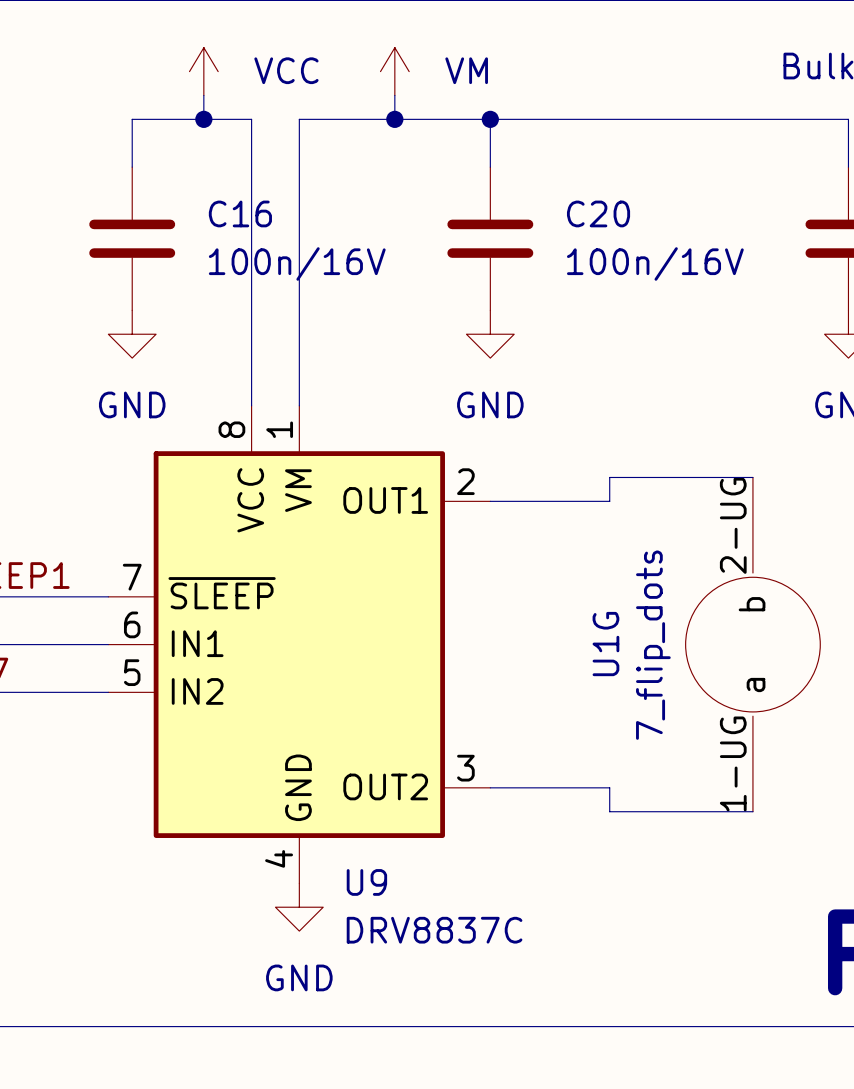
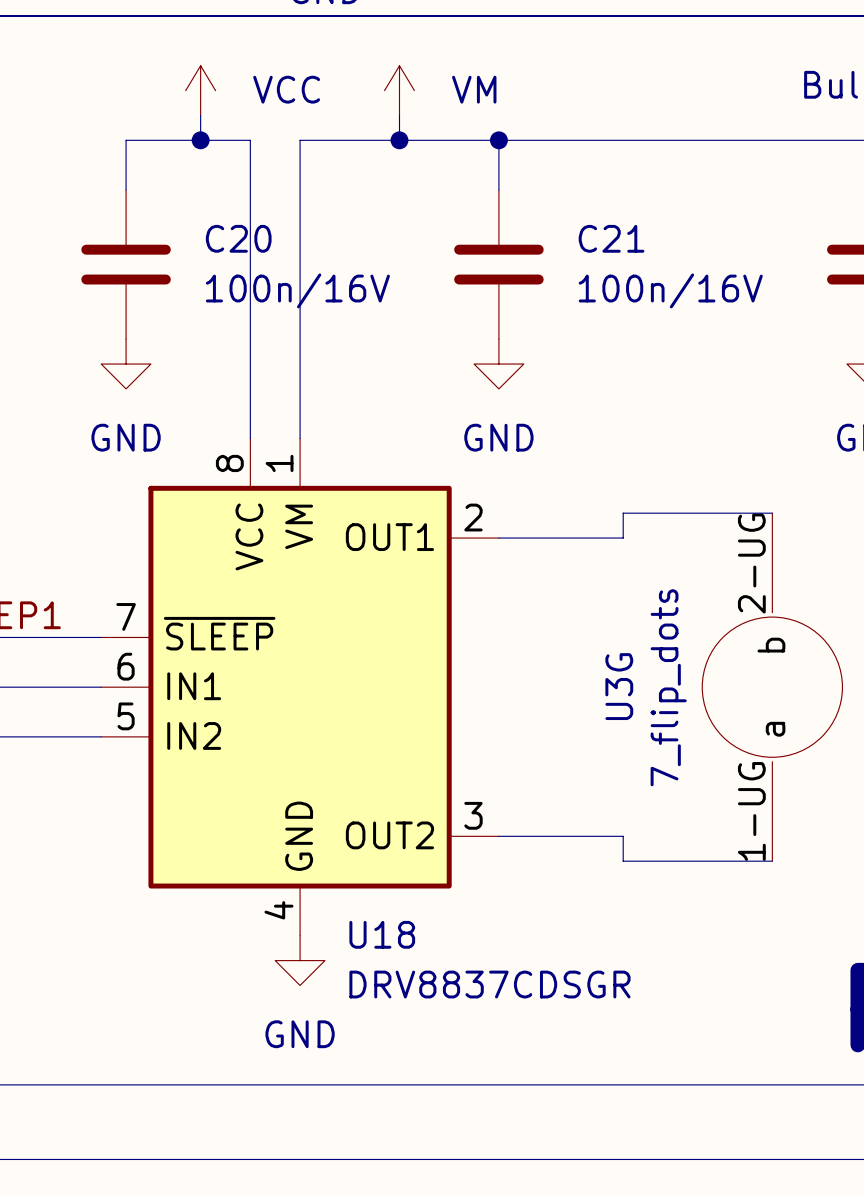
C16 name: C16 (240, 213) -> C20 (238, 238)
C20 name: C20 (598, 213) -> C21 (611, 238)
U1G name: U1G (605, 644) -> U3G (619, 686)
U9 name: U9 (366, 882) -> U18 (382, 934)
U9 value: DRV8837C (434, 930) -> DRV8837CDSGR (489, 984)

